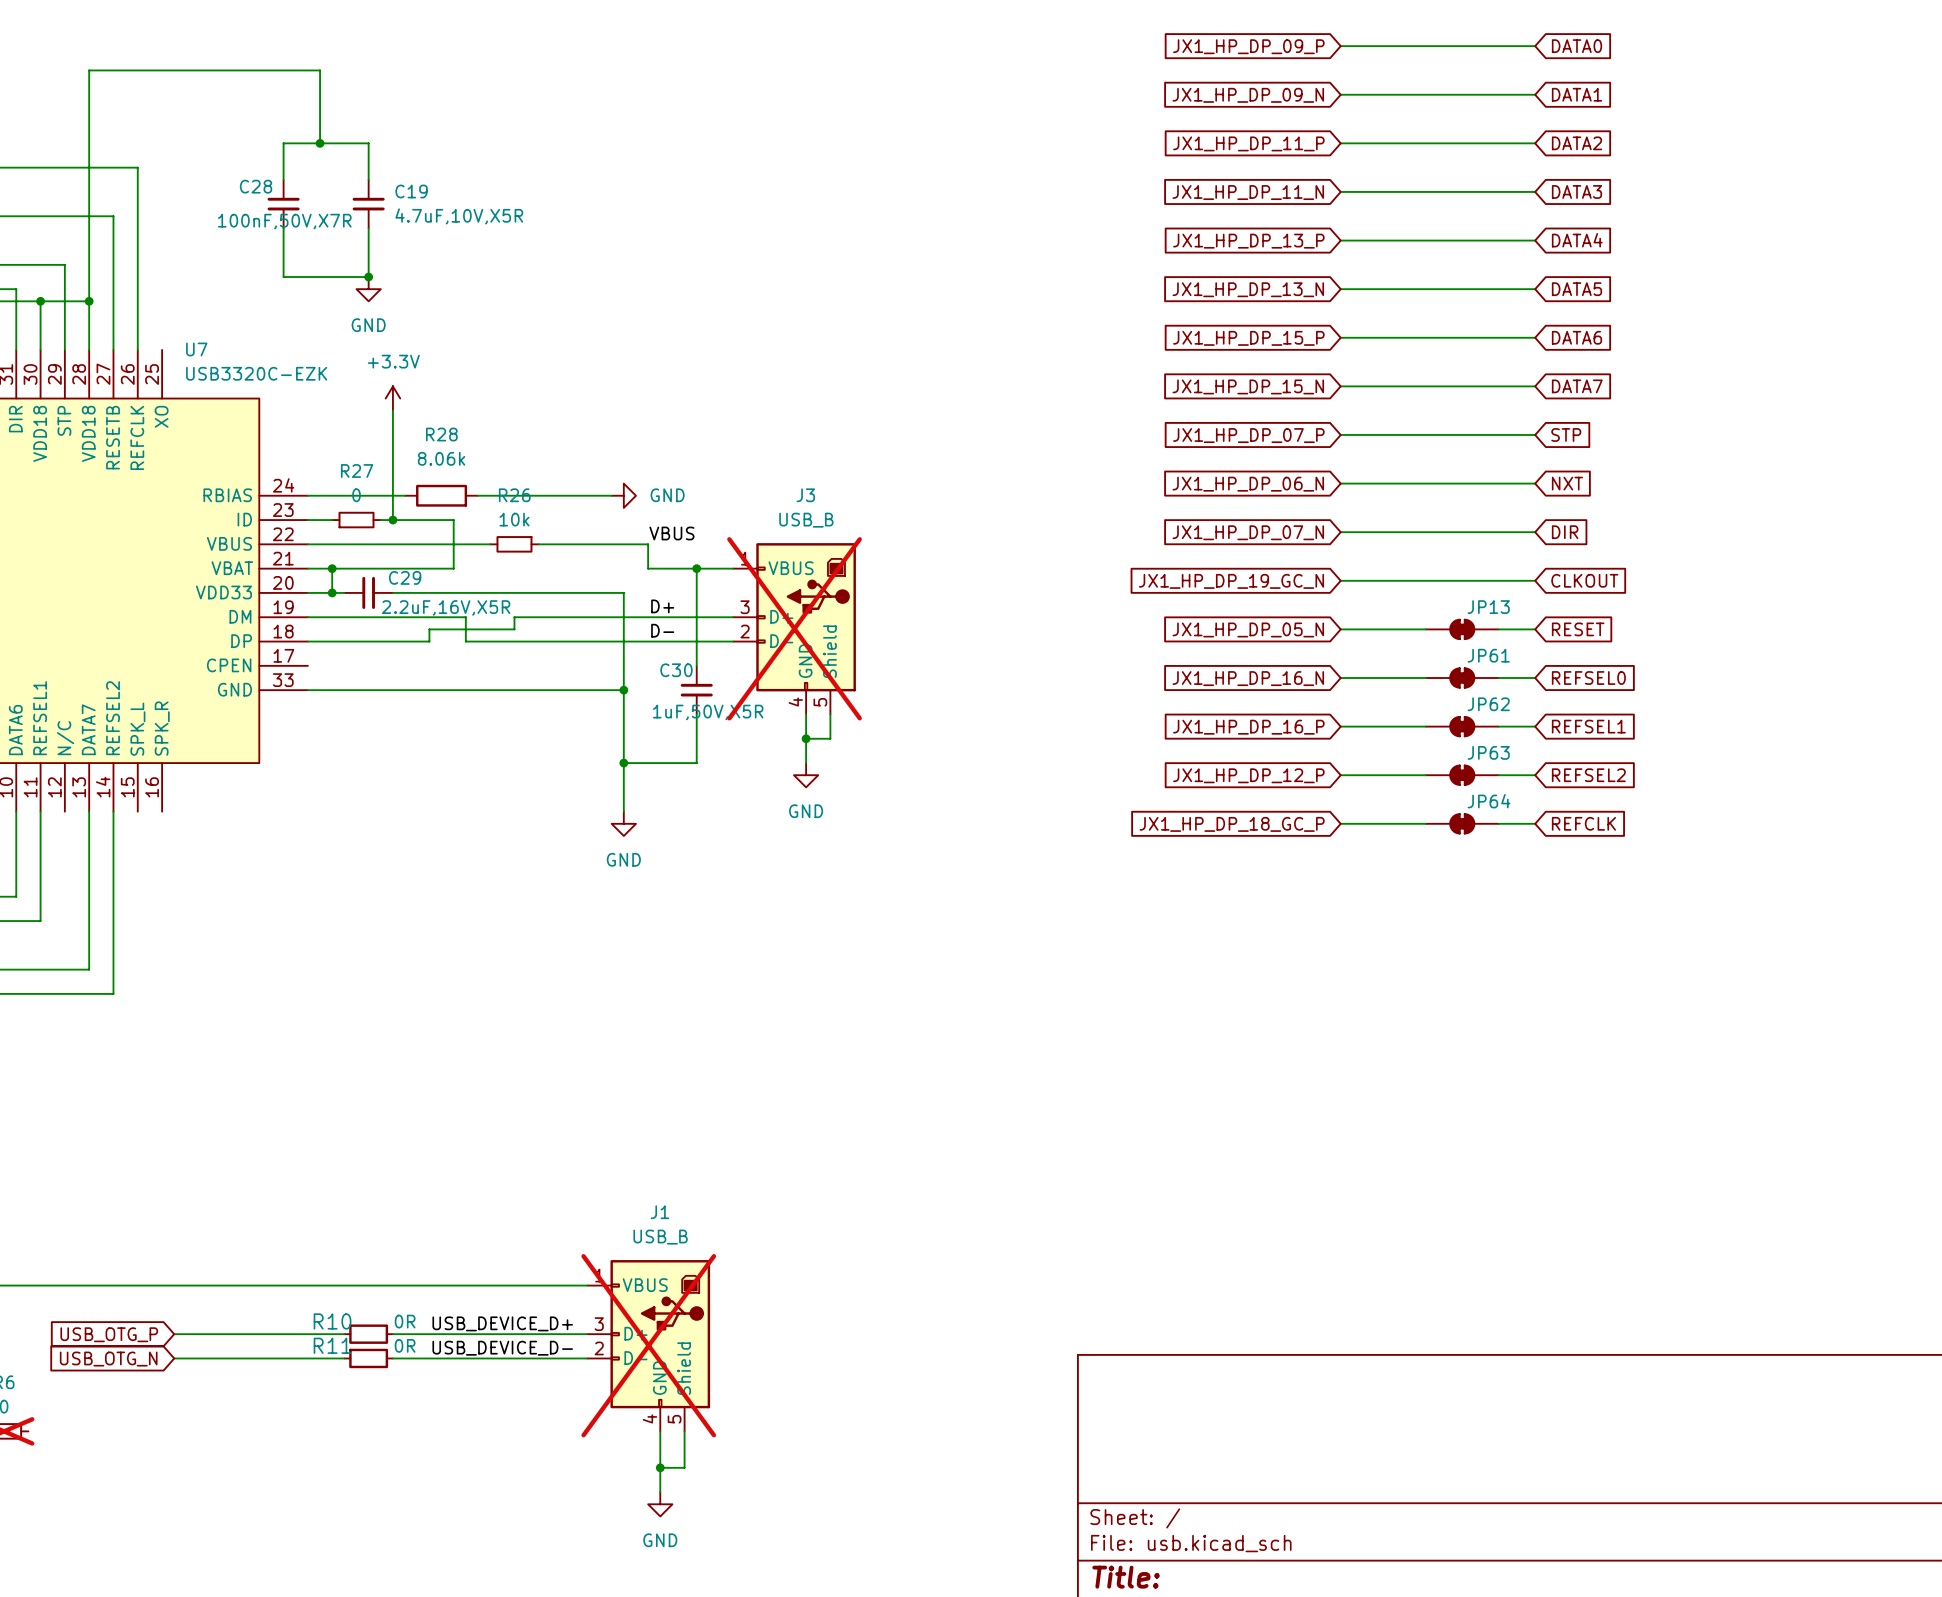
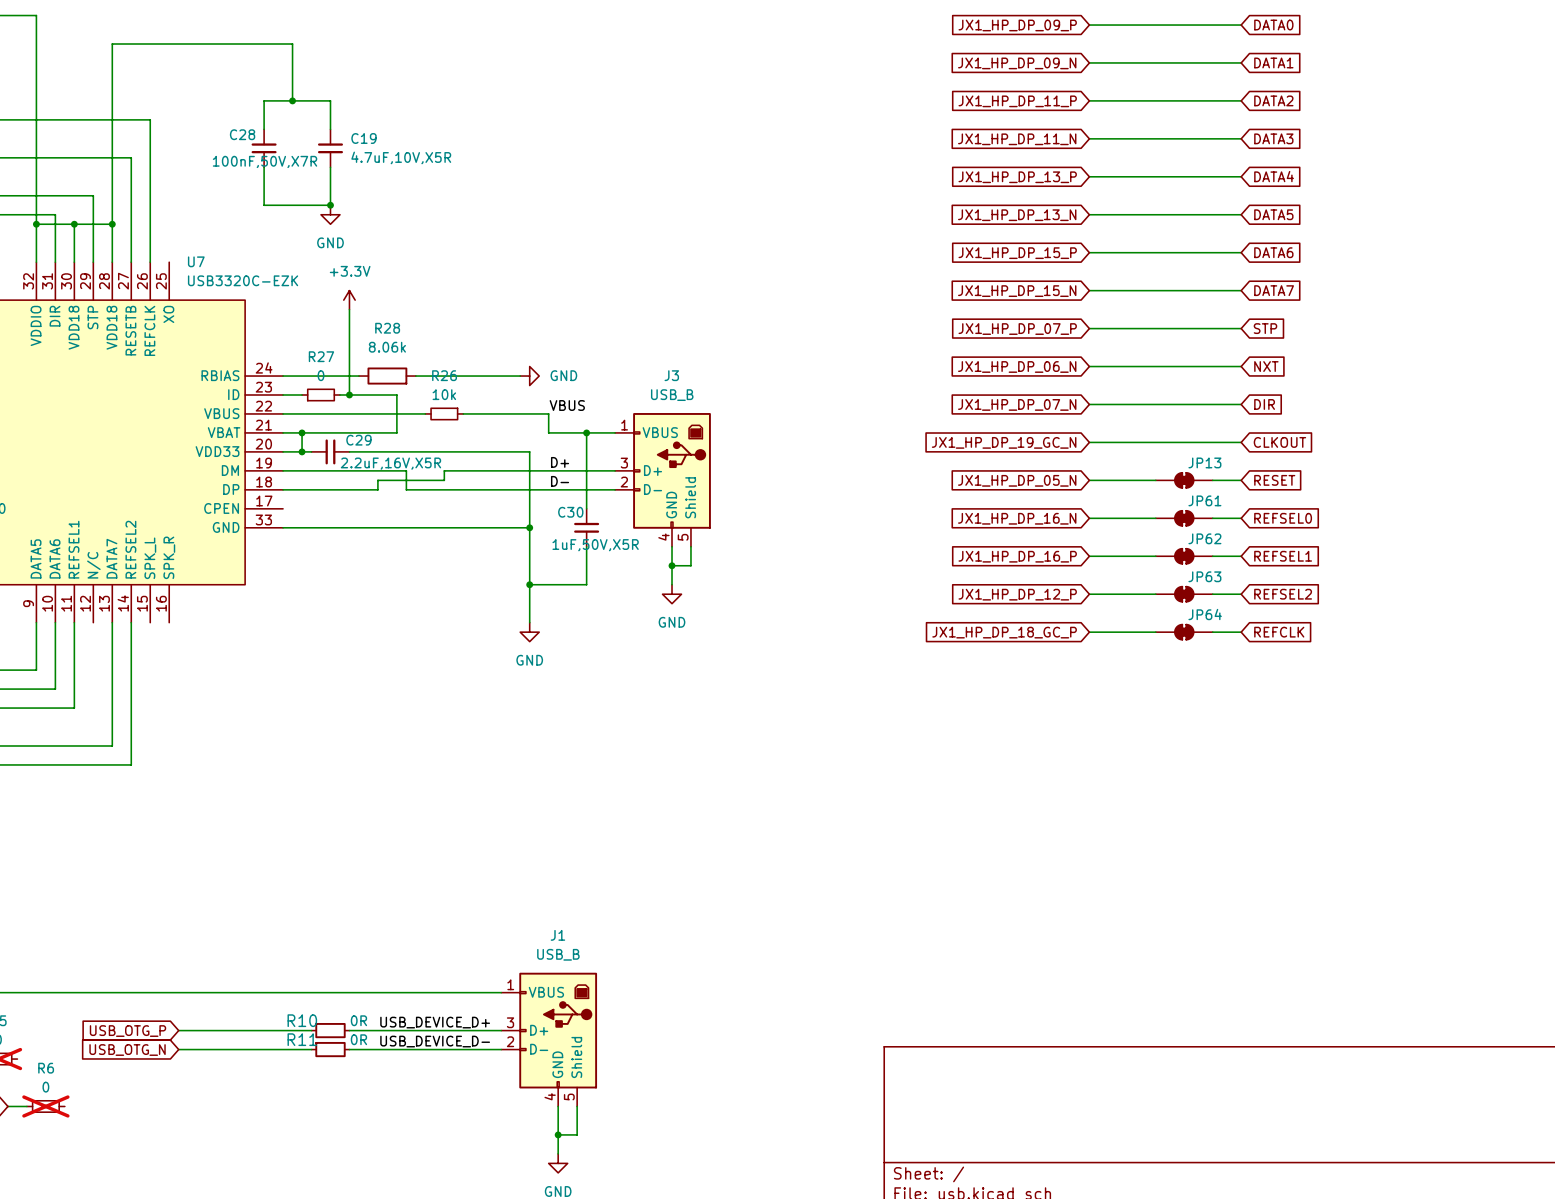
J3 do-not-place cross: (794, 628) -> none
J1 do-not-place cross: (648, 1345) -> none

